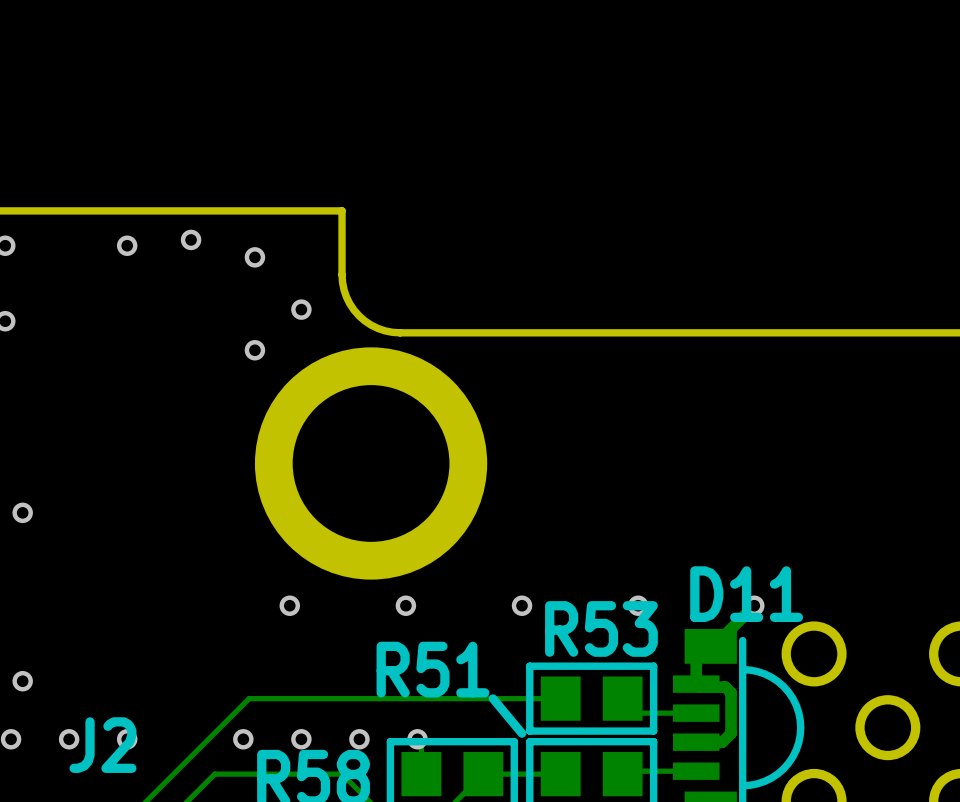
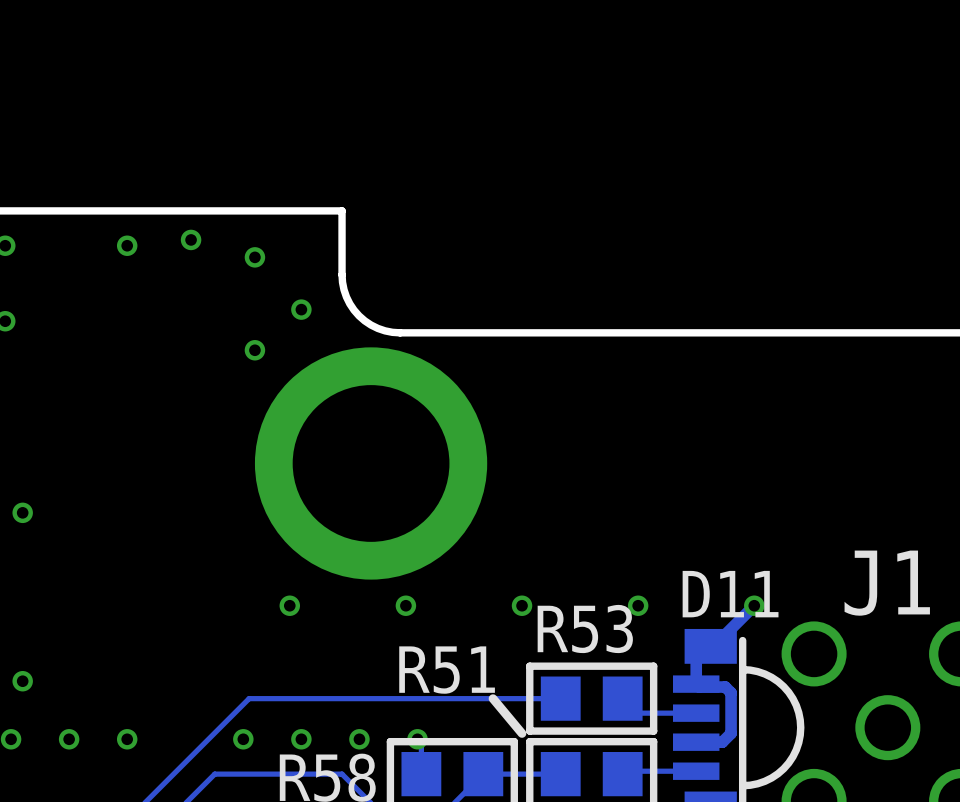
J2 name: J2 (102, 745) -> J1 (887, 583)

